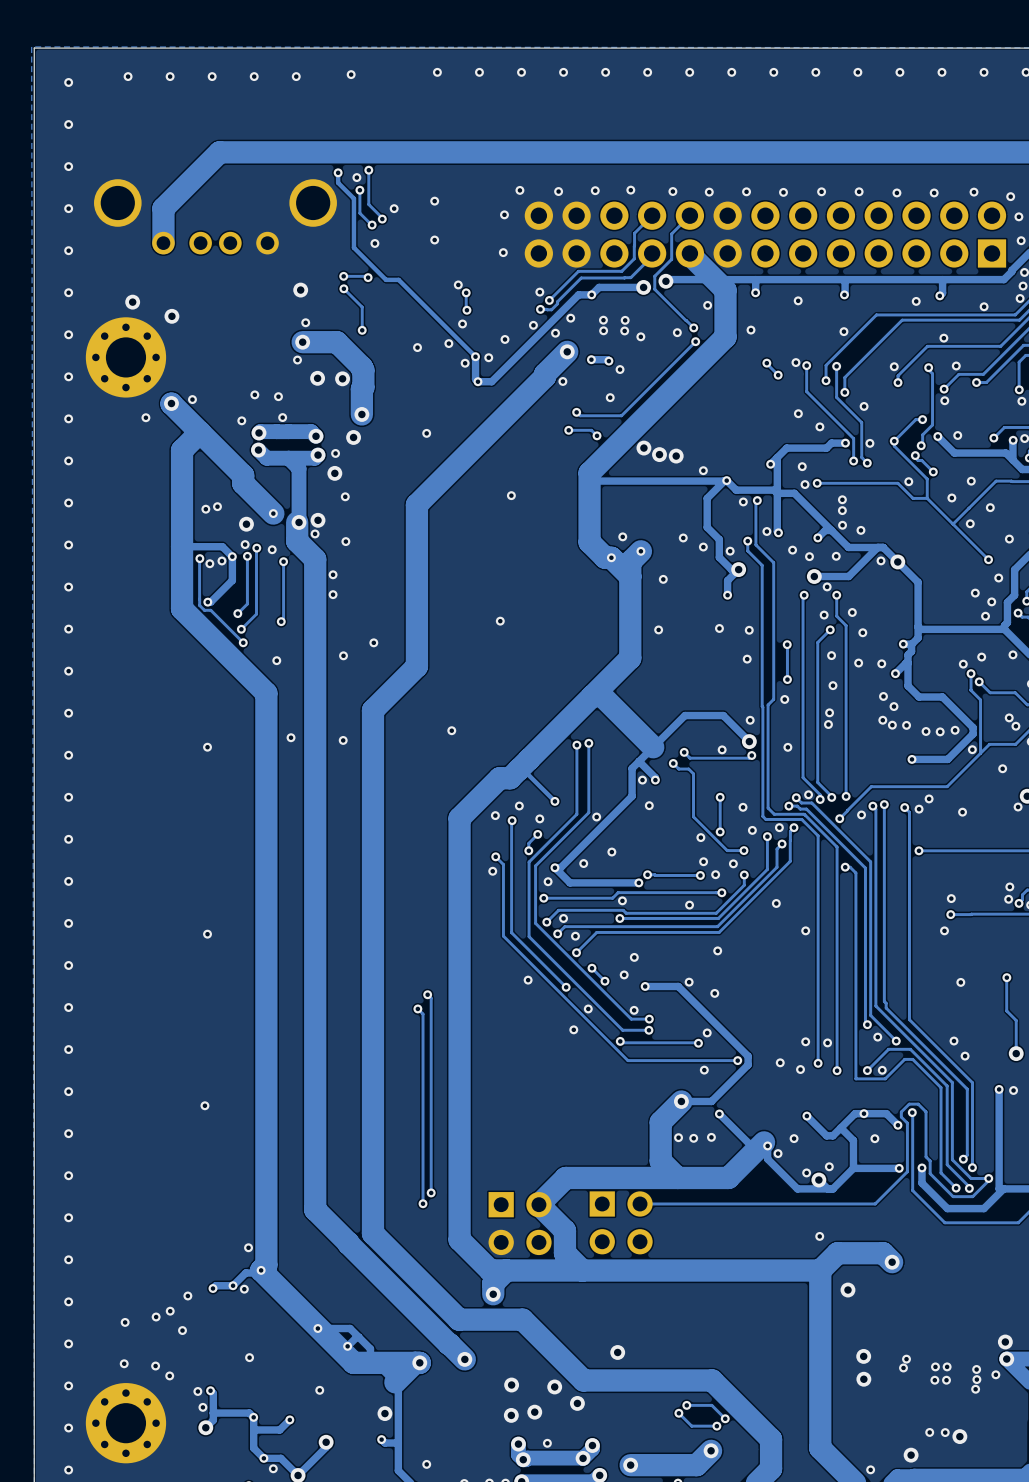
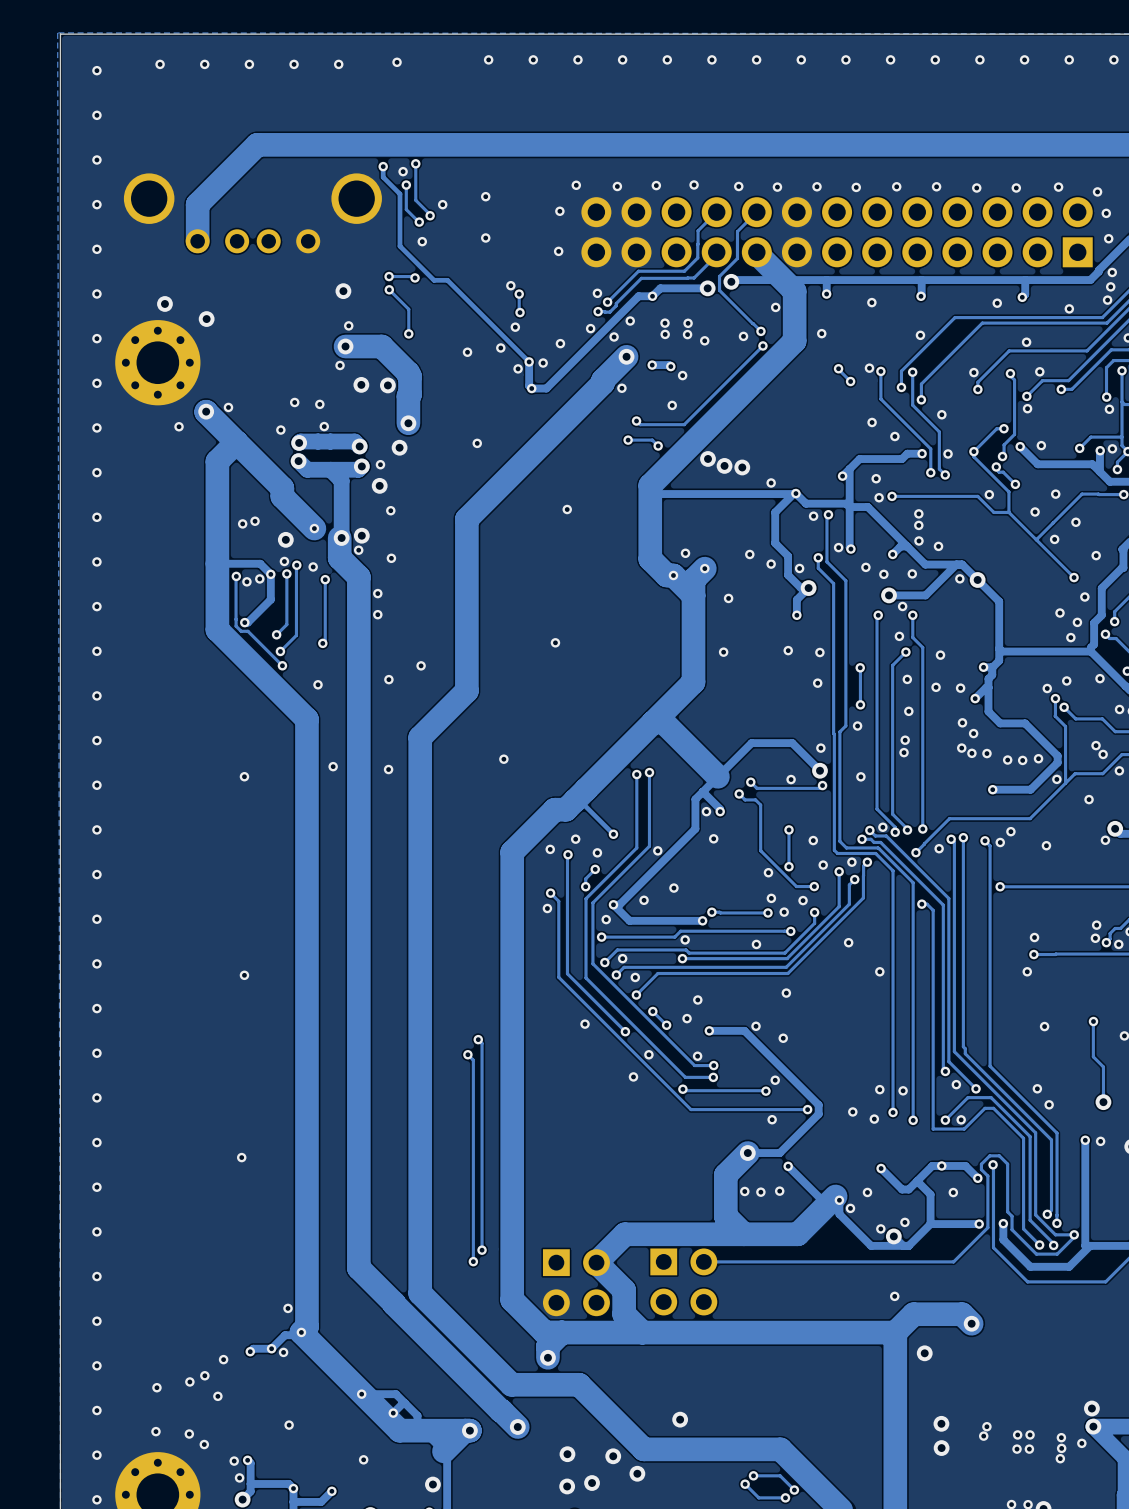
via: (852, 612) -> none

